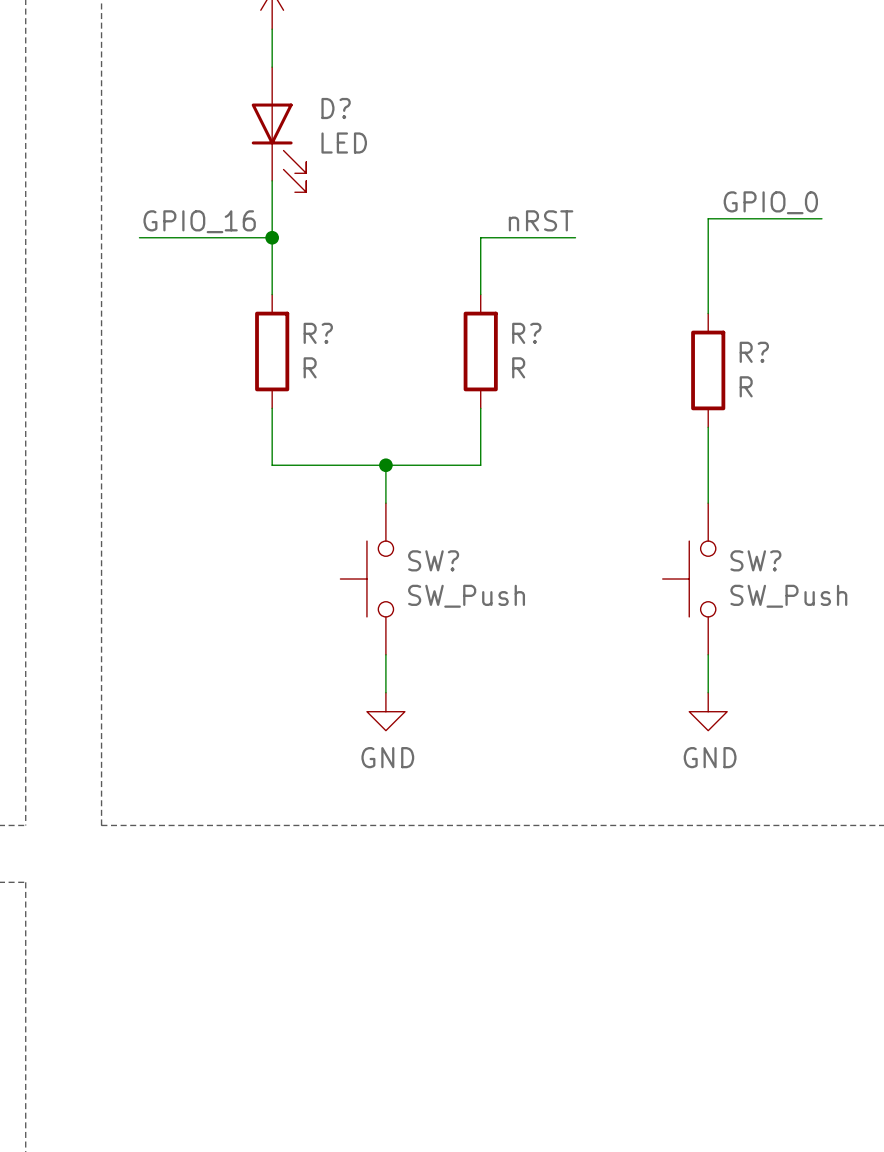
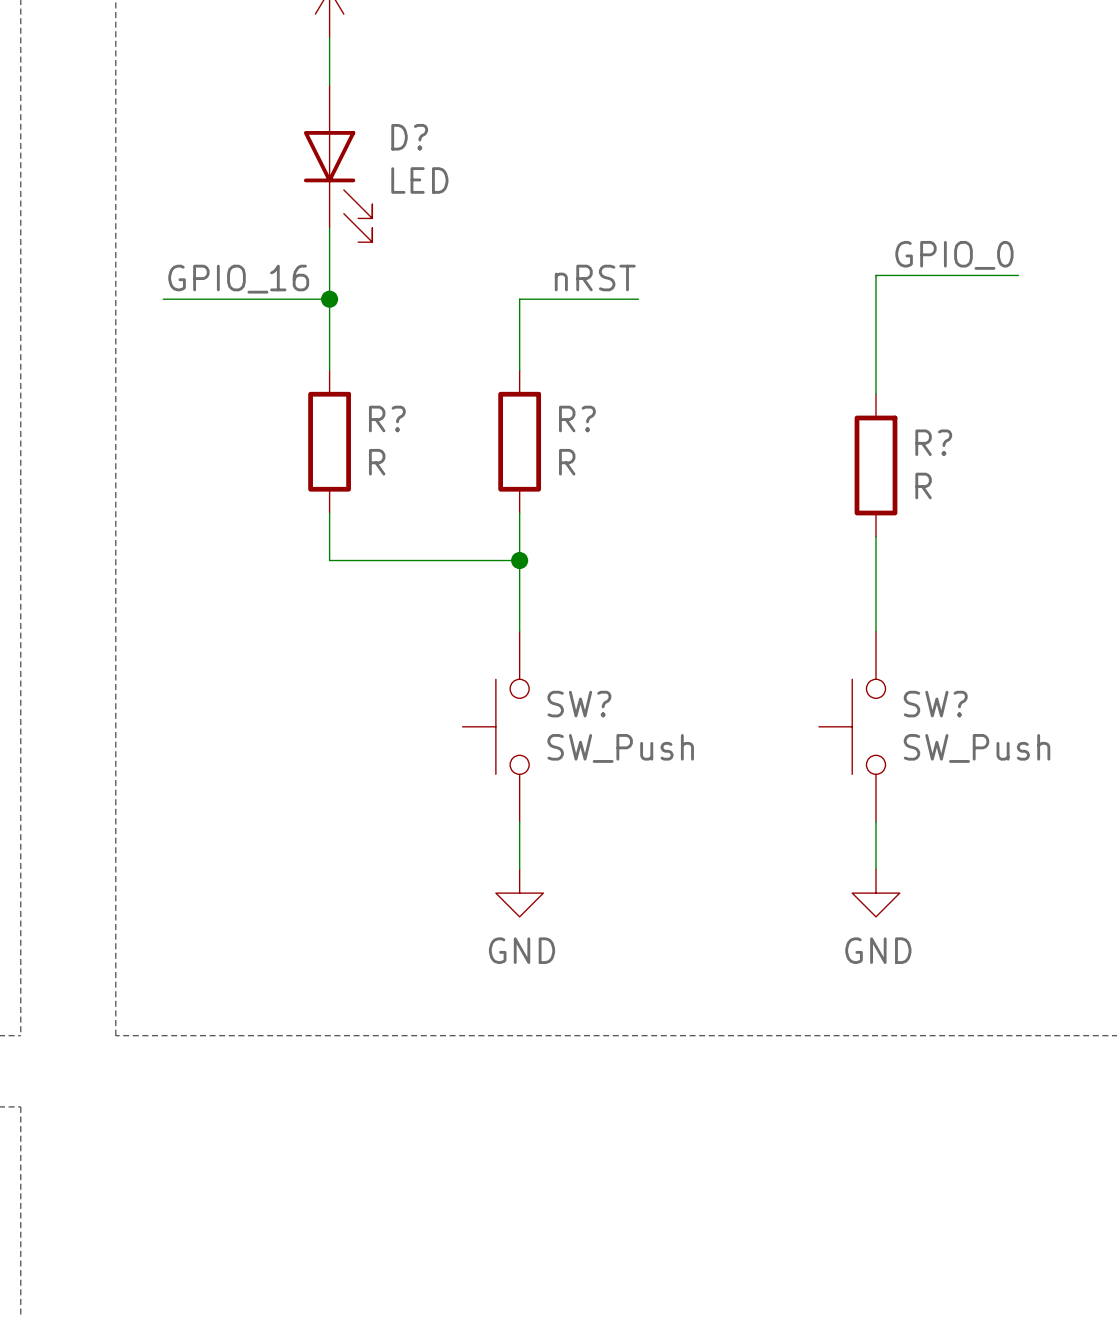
label position: nRST (541, 220) -> nRST (595, 278)
wire: (480, 237) (480, 294) -> (590, 299) (519, 299) (519, 370)
wire: (518, 237) (575, 237) -> none
R? position: (480, 351) -> (519, 441)
wire: none -> (519, 513) (519, 631)
wire: (480, 408) (480, 465) (272, 465) (272, 446) -> (519, 560) (329, 560)
wire: (385, 465) (385, 503) -> none
junction position: (385, 465) -> (519, 560)
SW? position: (366, 579) -> (495, 726)
wire: (385, 654) (385, 692) -> (519, 821) (519, 869)
power symbol position: GND (385, 711) -> GND (519, 893)

